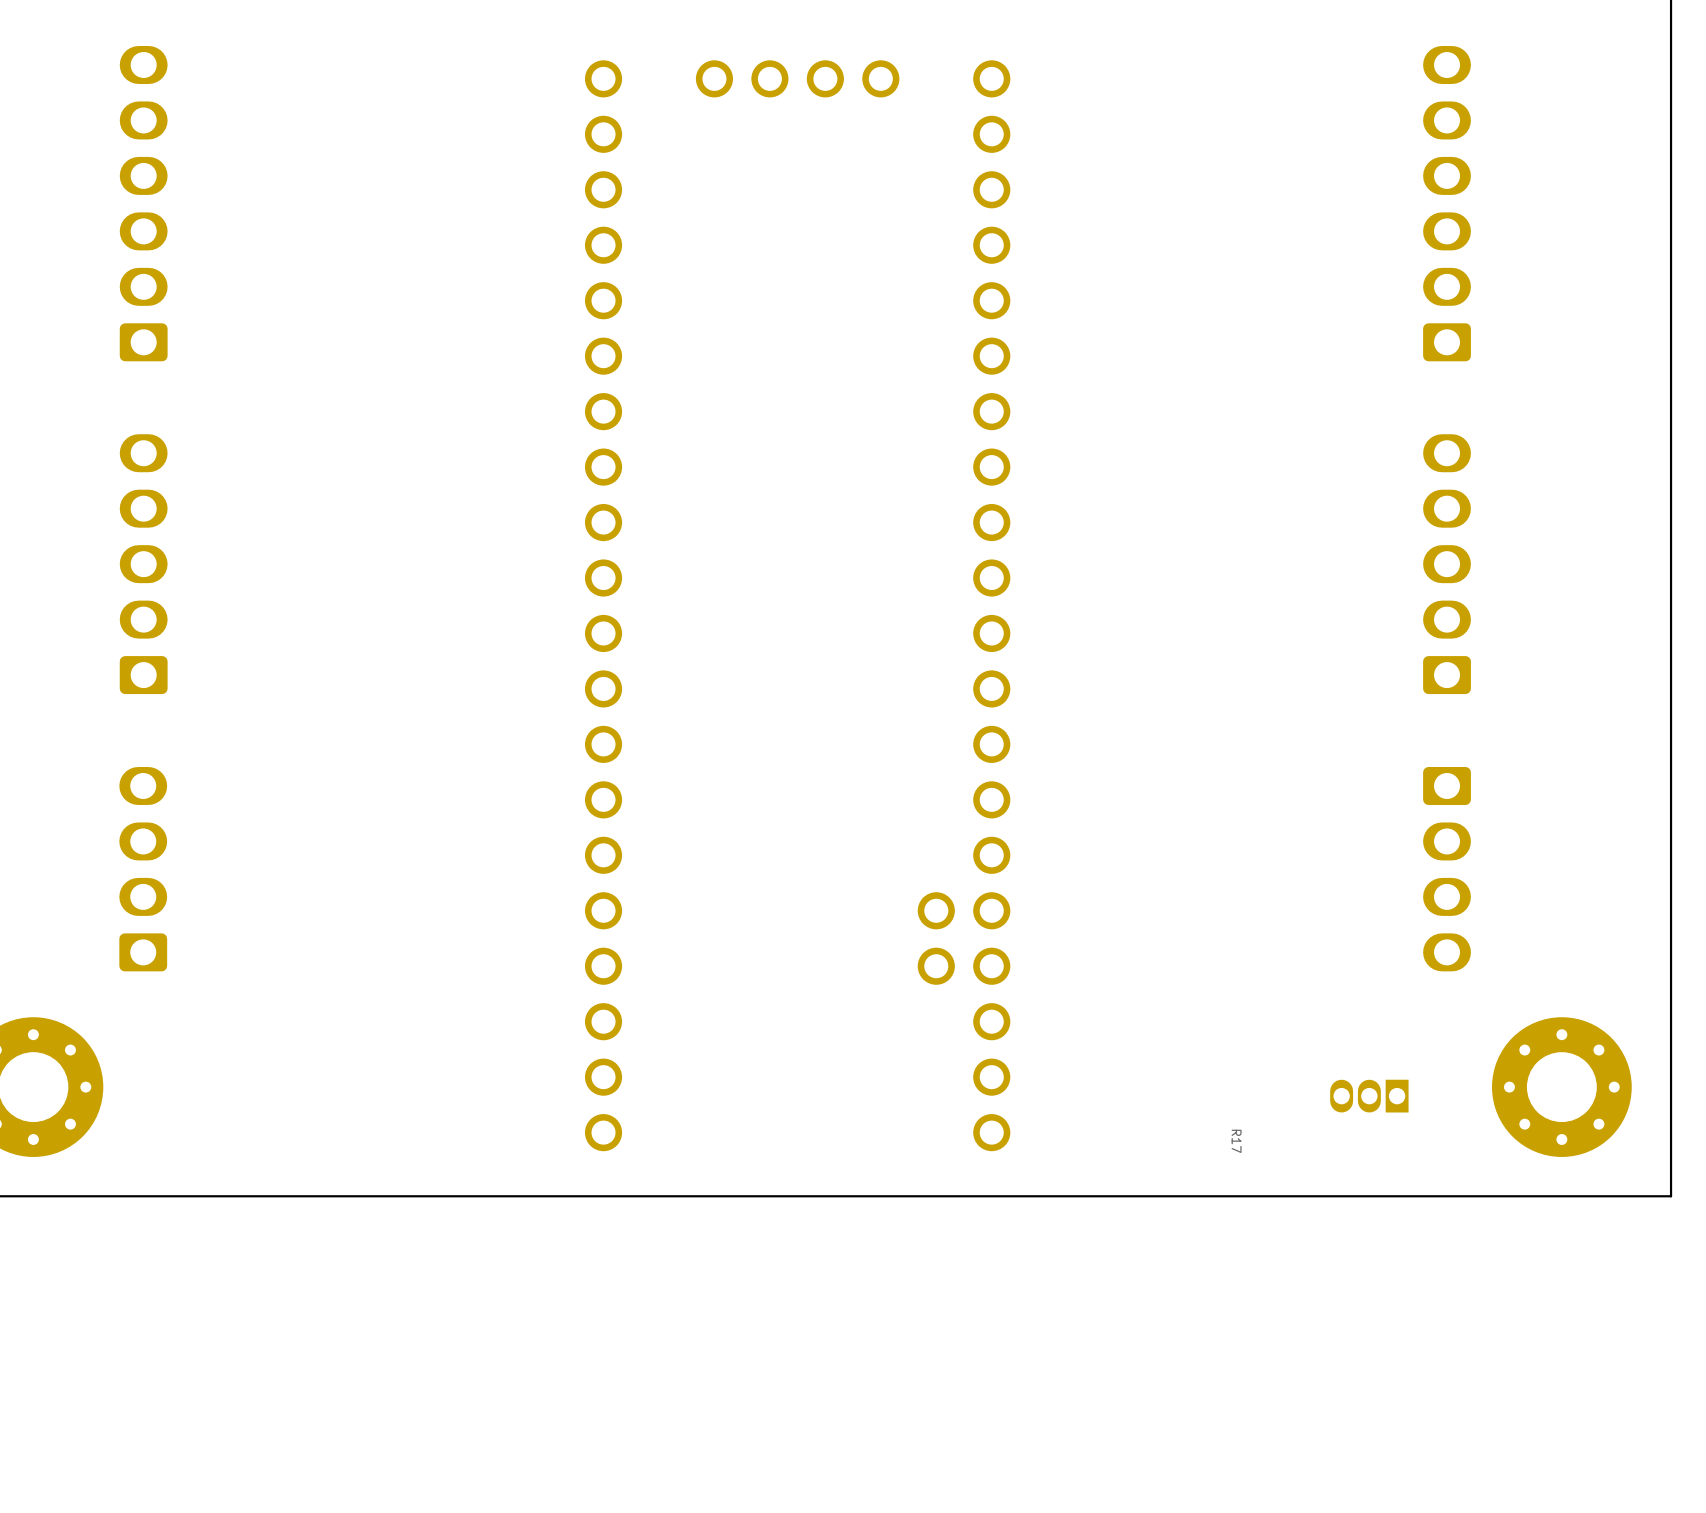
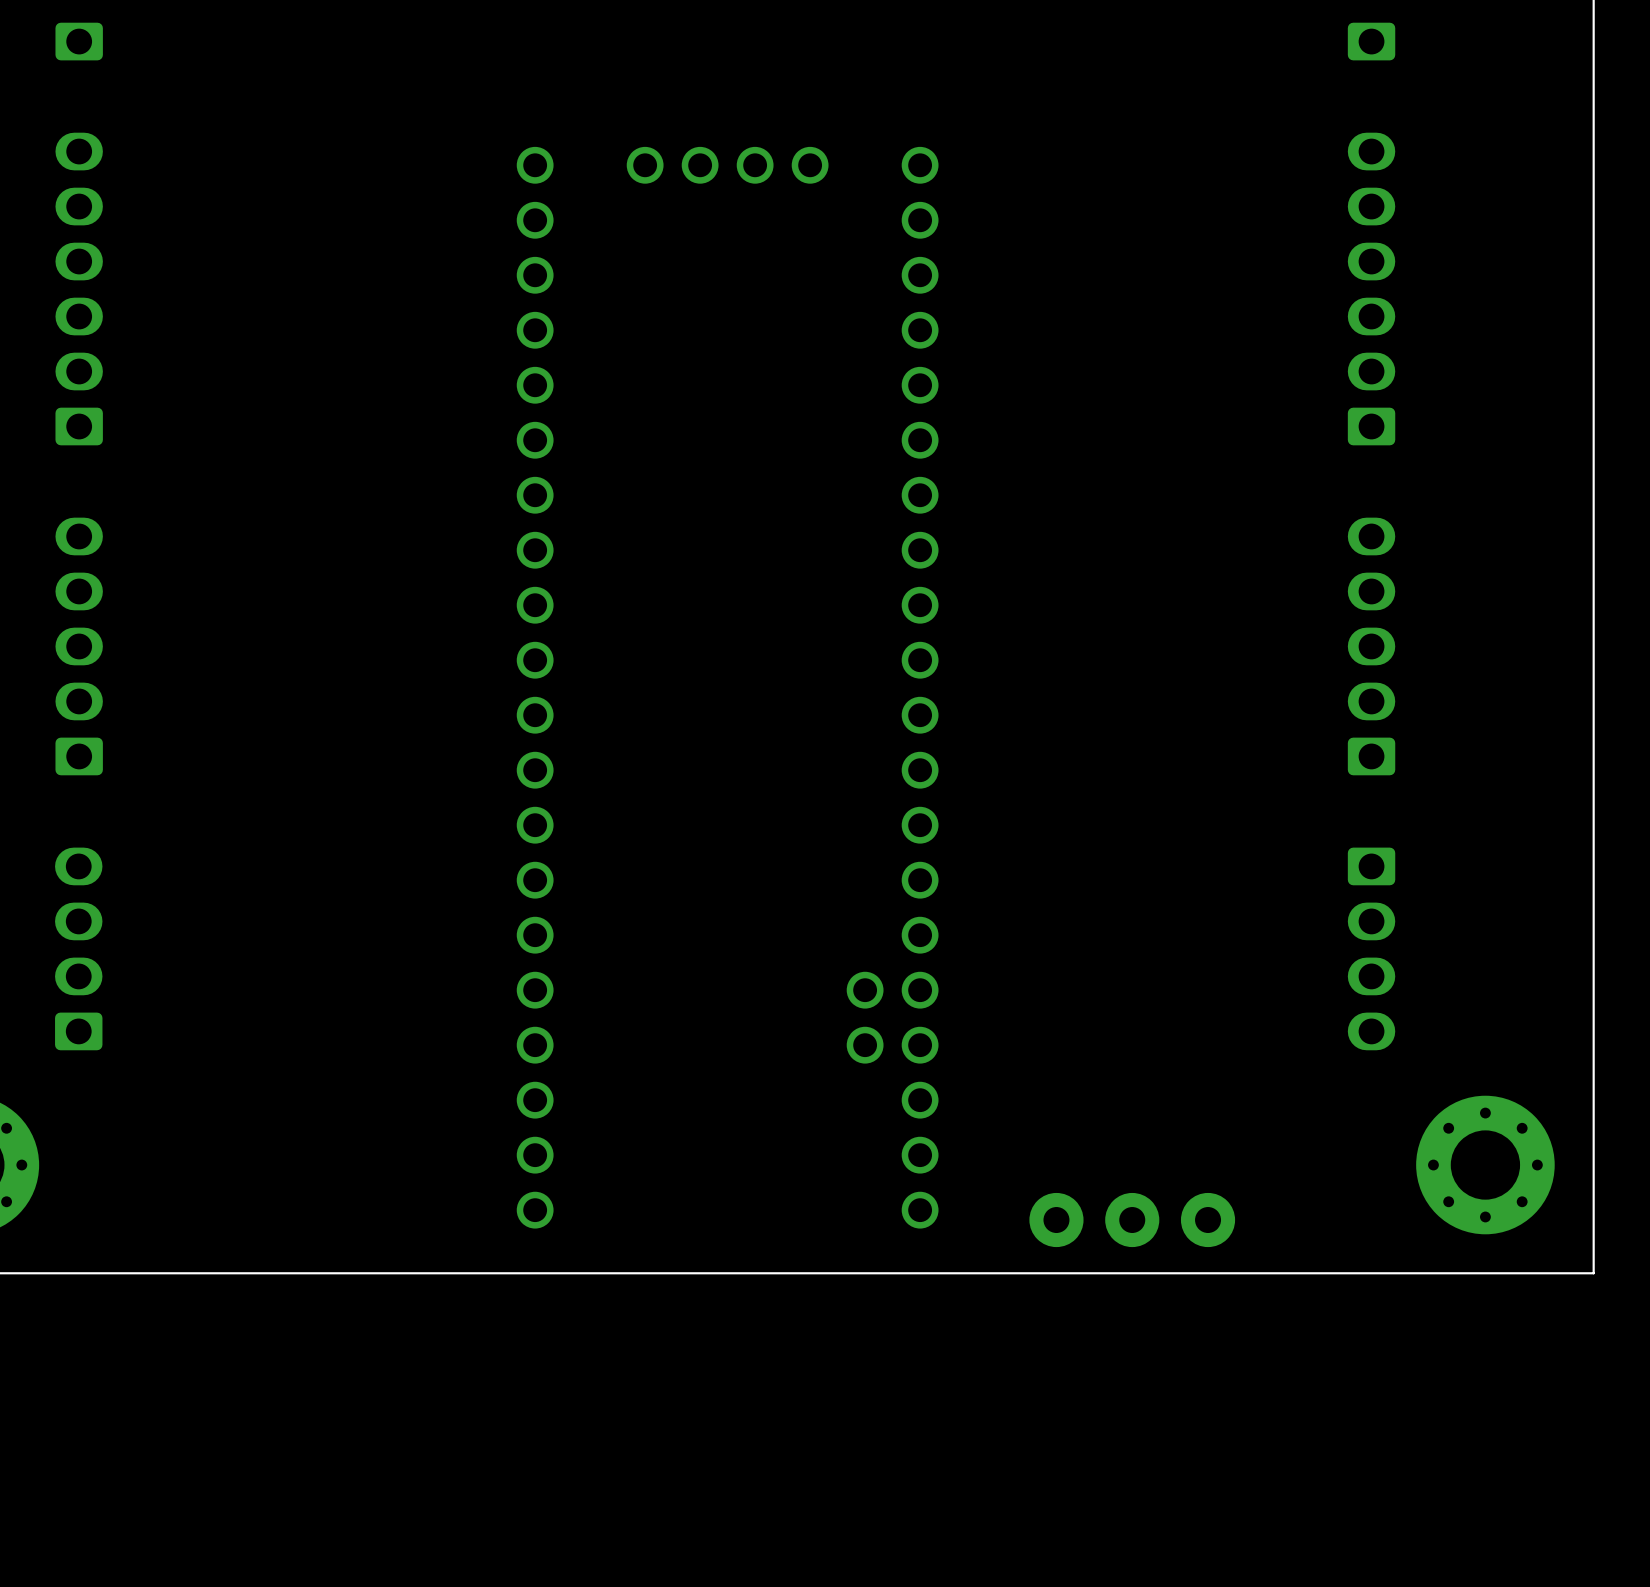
part: (1369, 1096) -> none
R17: (1236, 1141) -> none
part: none -> (1056, 1220)
part: none -> (1132, 1220)
part: none -> (1208, 1220)

